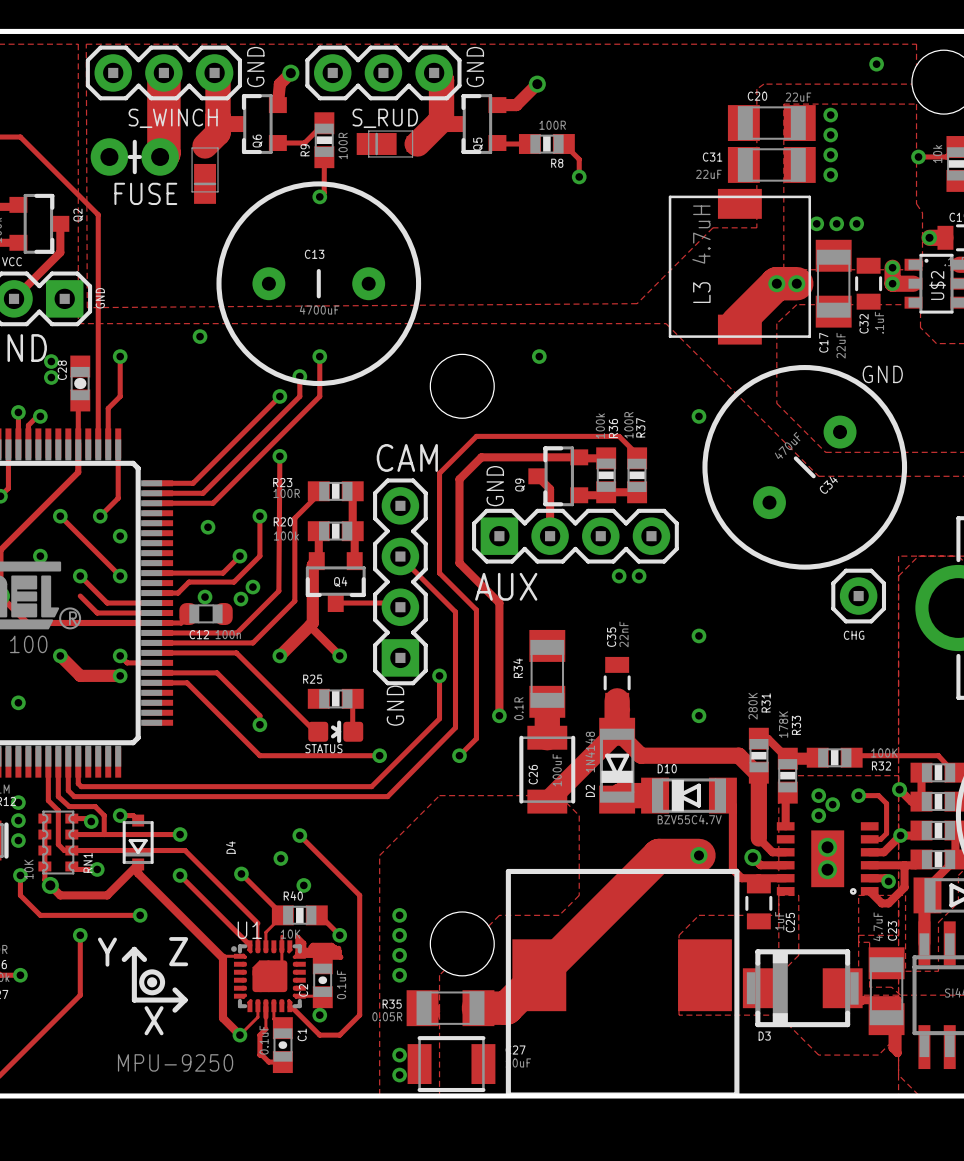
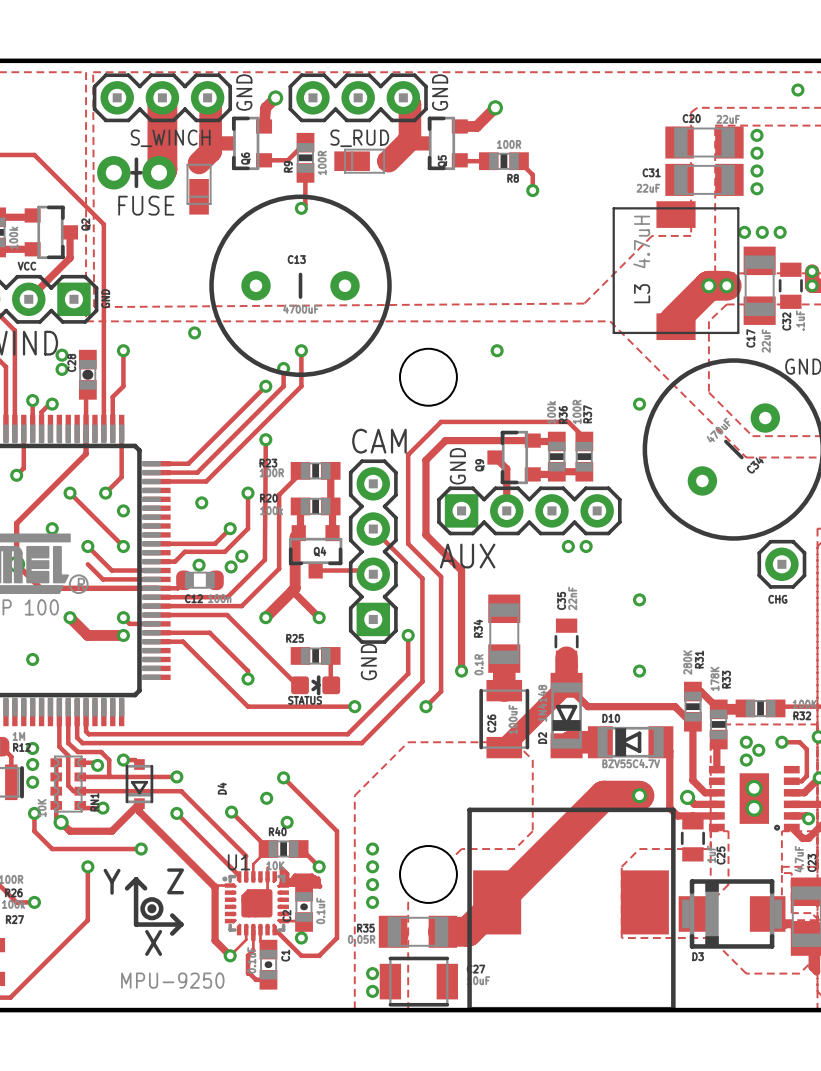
track width: thick (617, 731) (641, 755) (738, 755) (755, 772) -> thin (566, 685) (587, 706) (675, 706) (690, 721)
track width: thick (758, 772) (758, 838) -> thin (692, 721) (692, 780)

